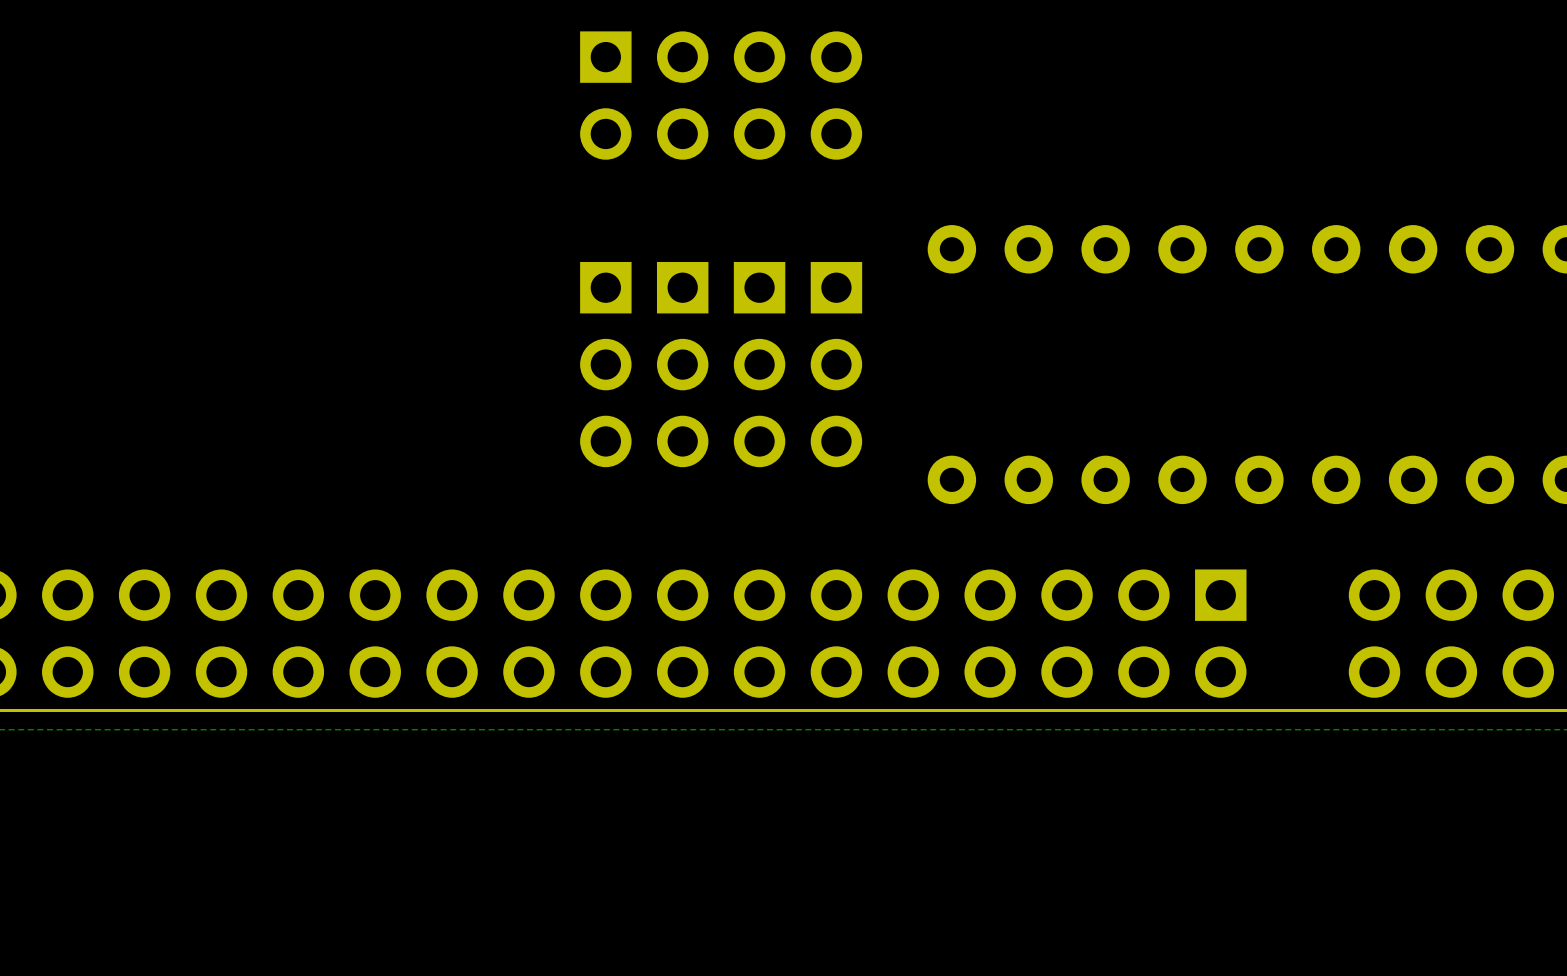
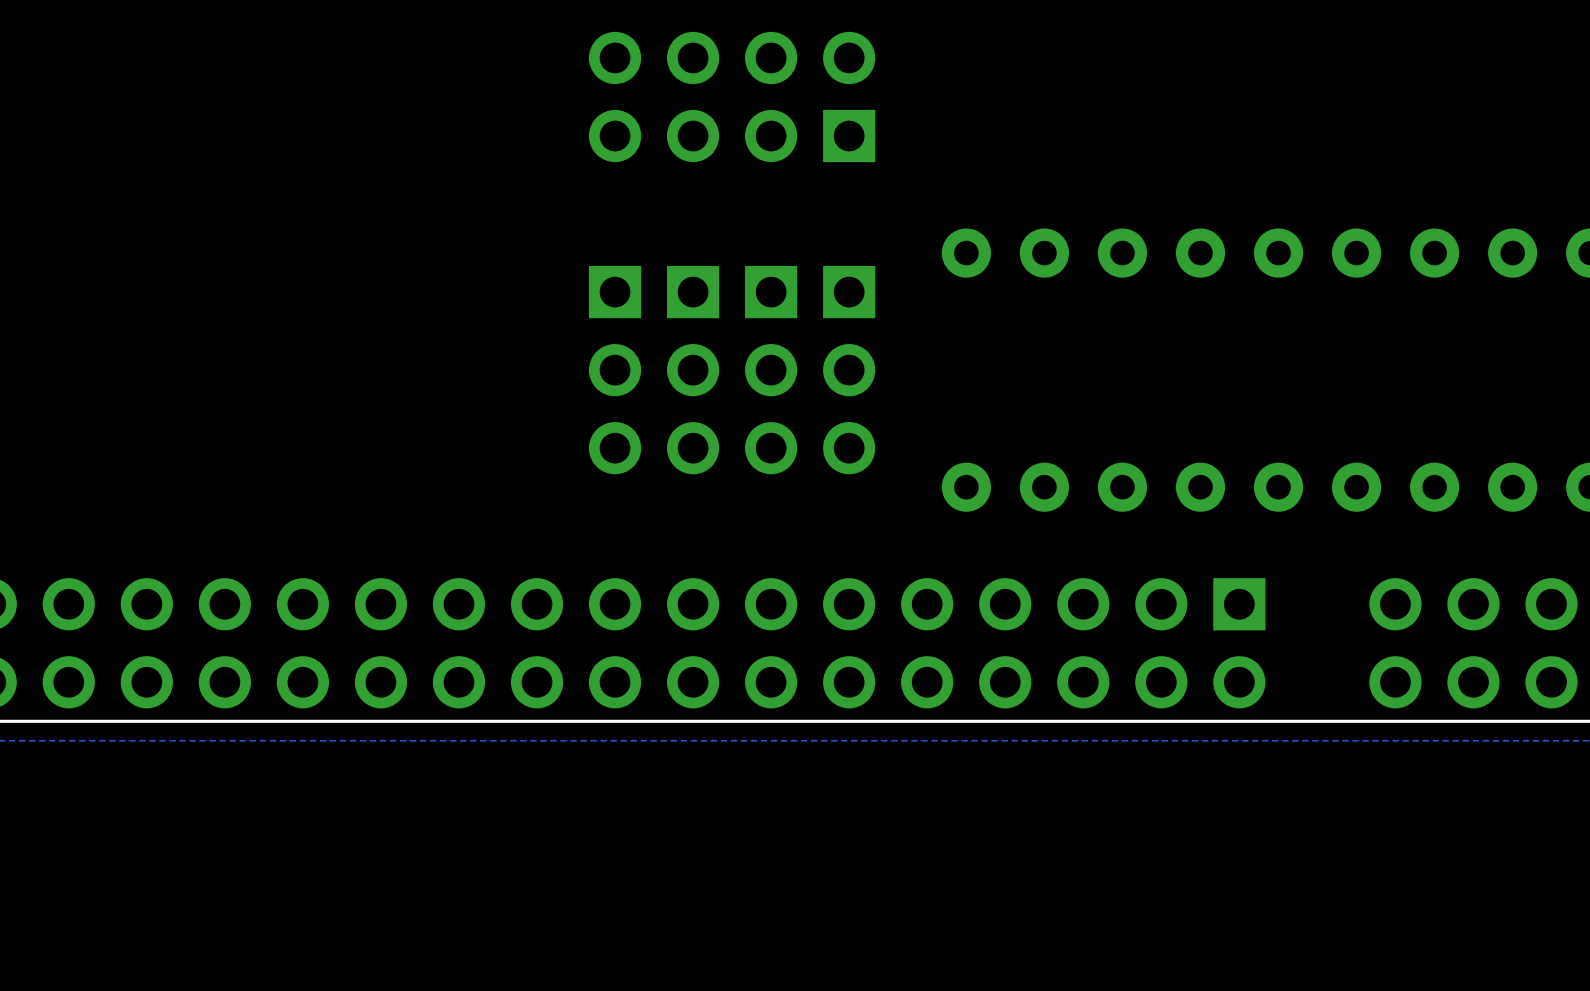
part rotation: 0° (721, 95) -> 180° (732, 96)

